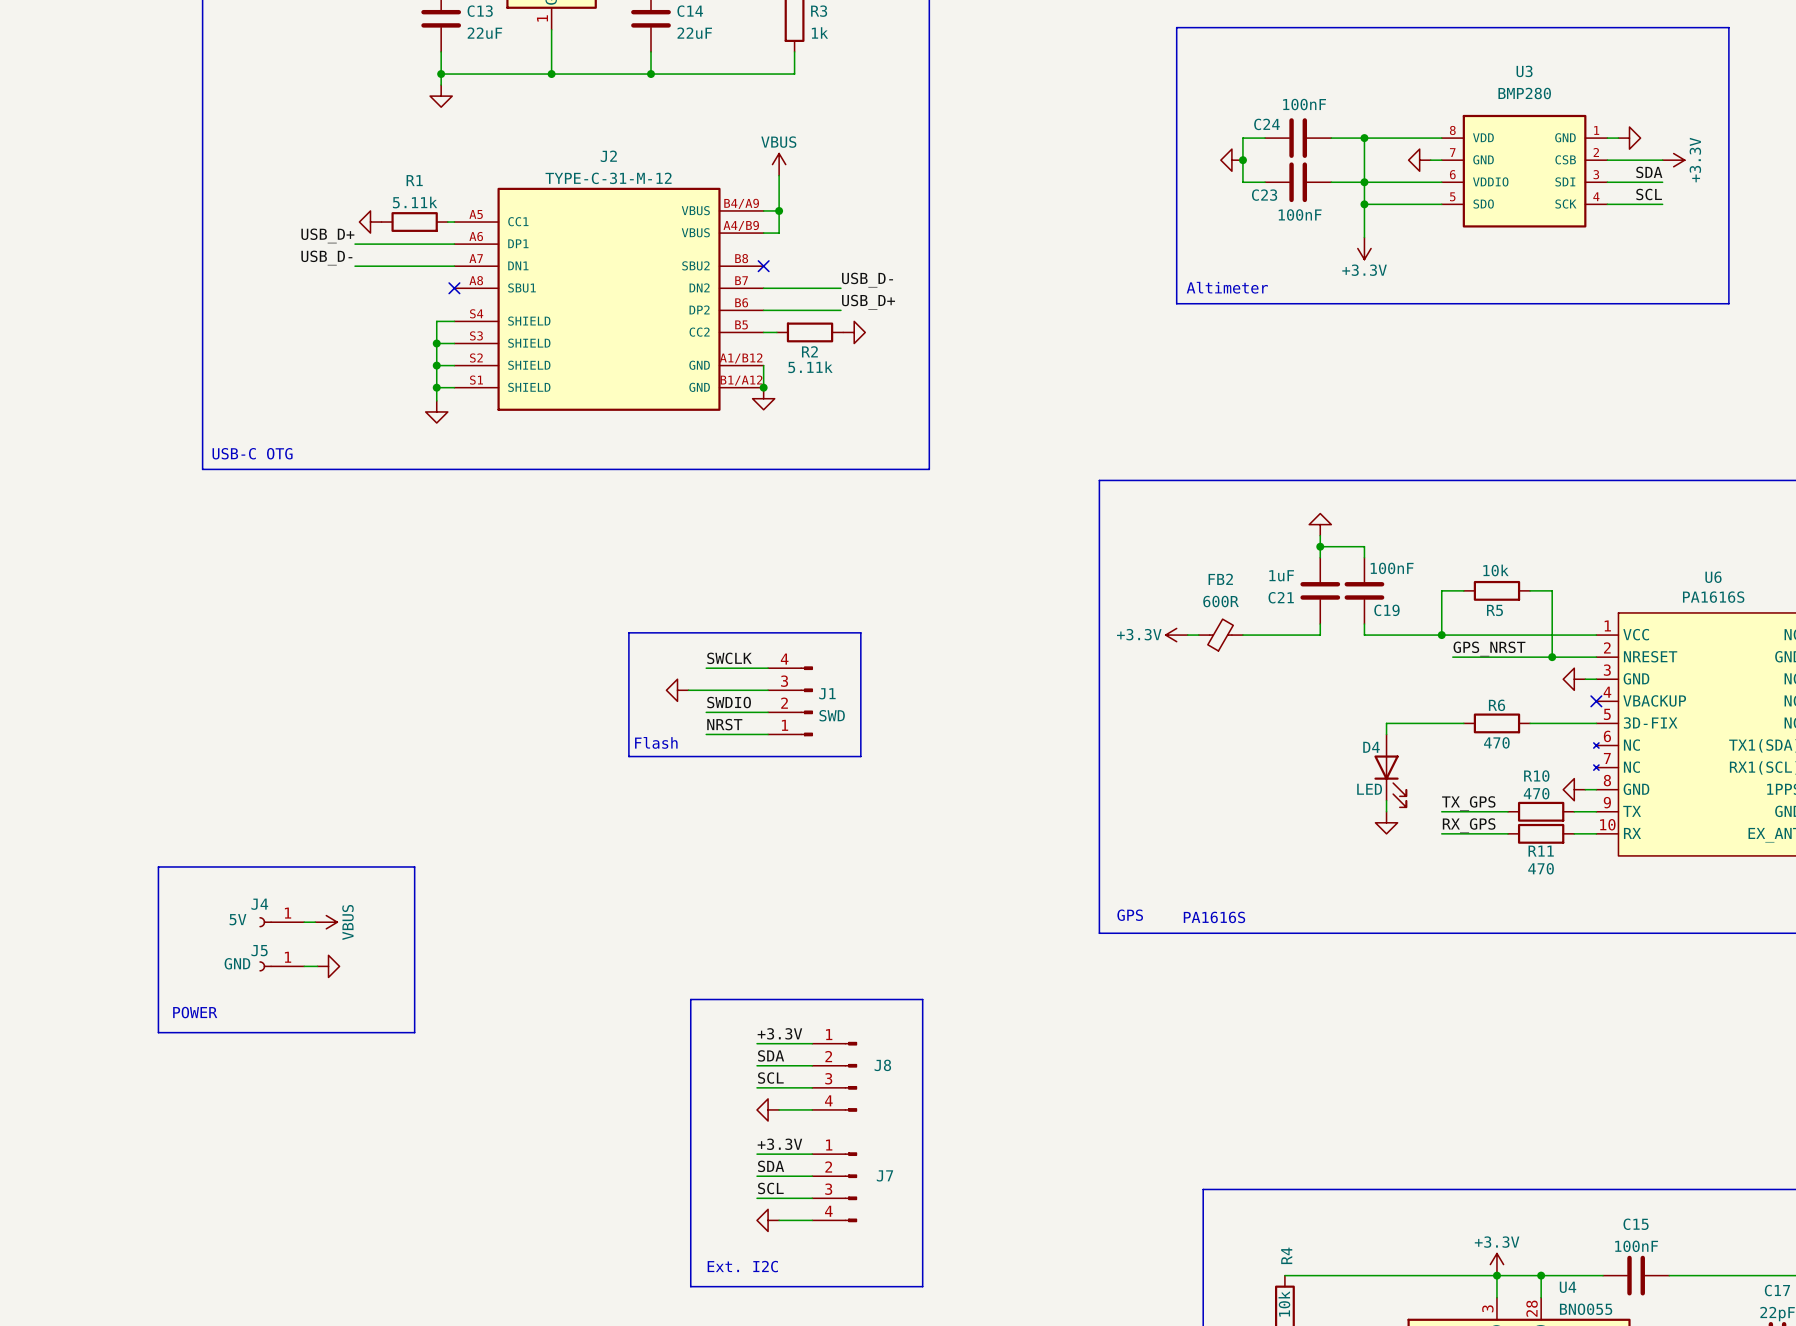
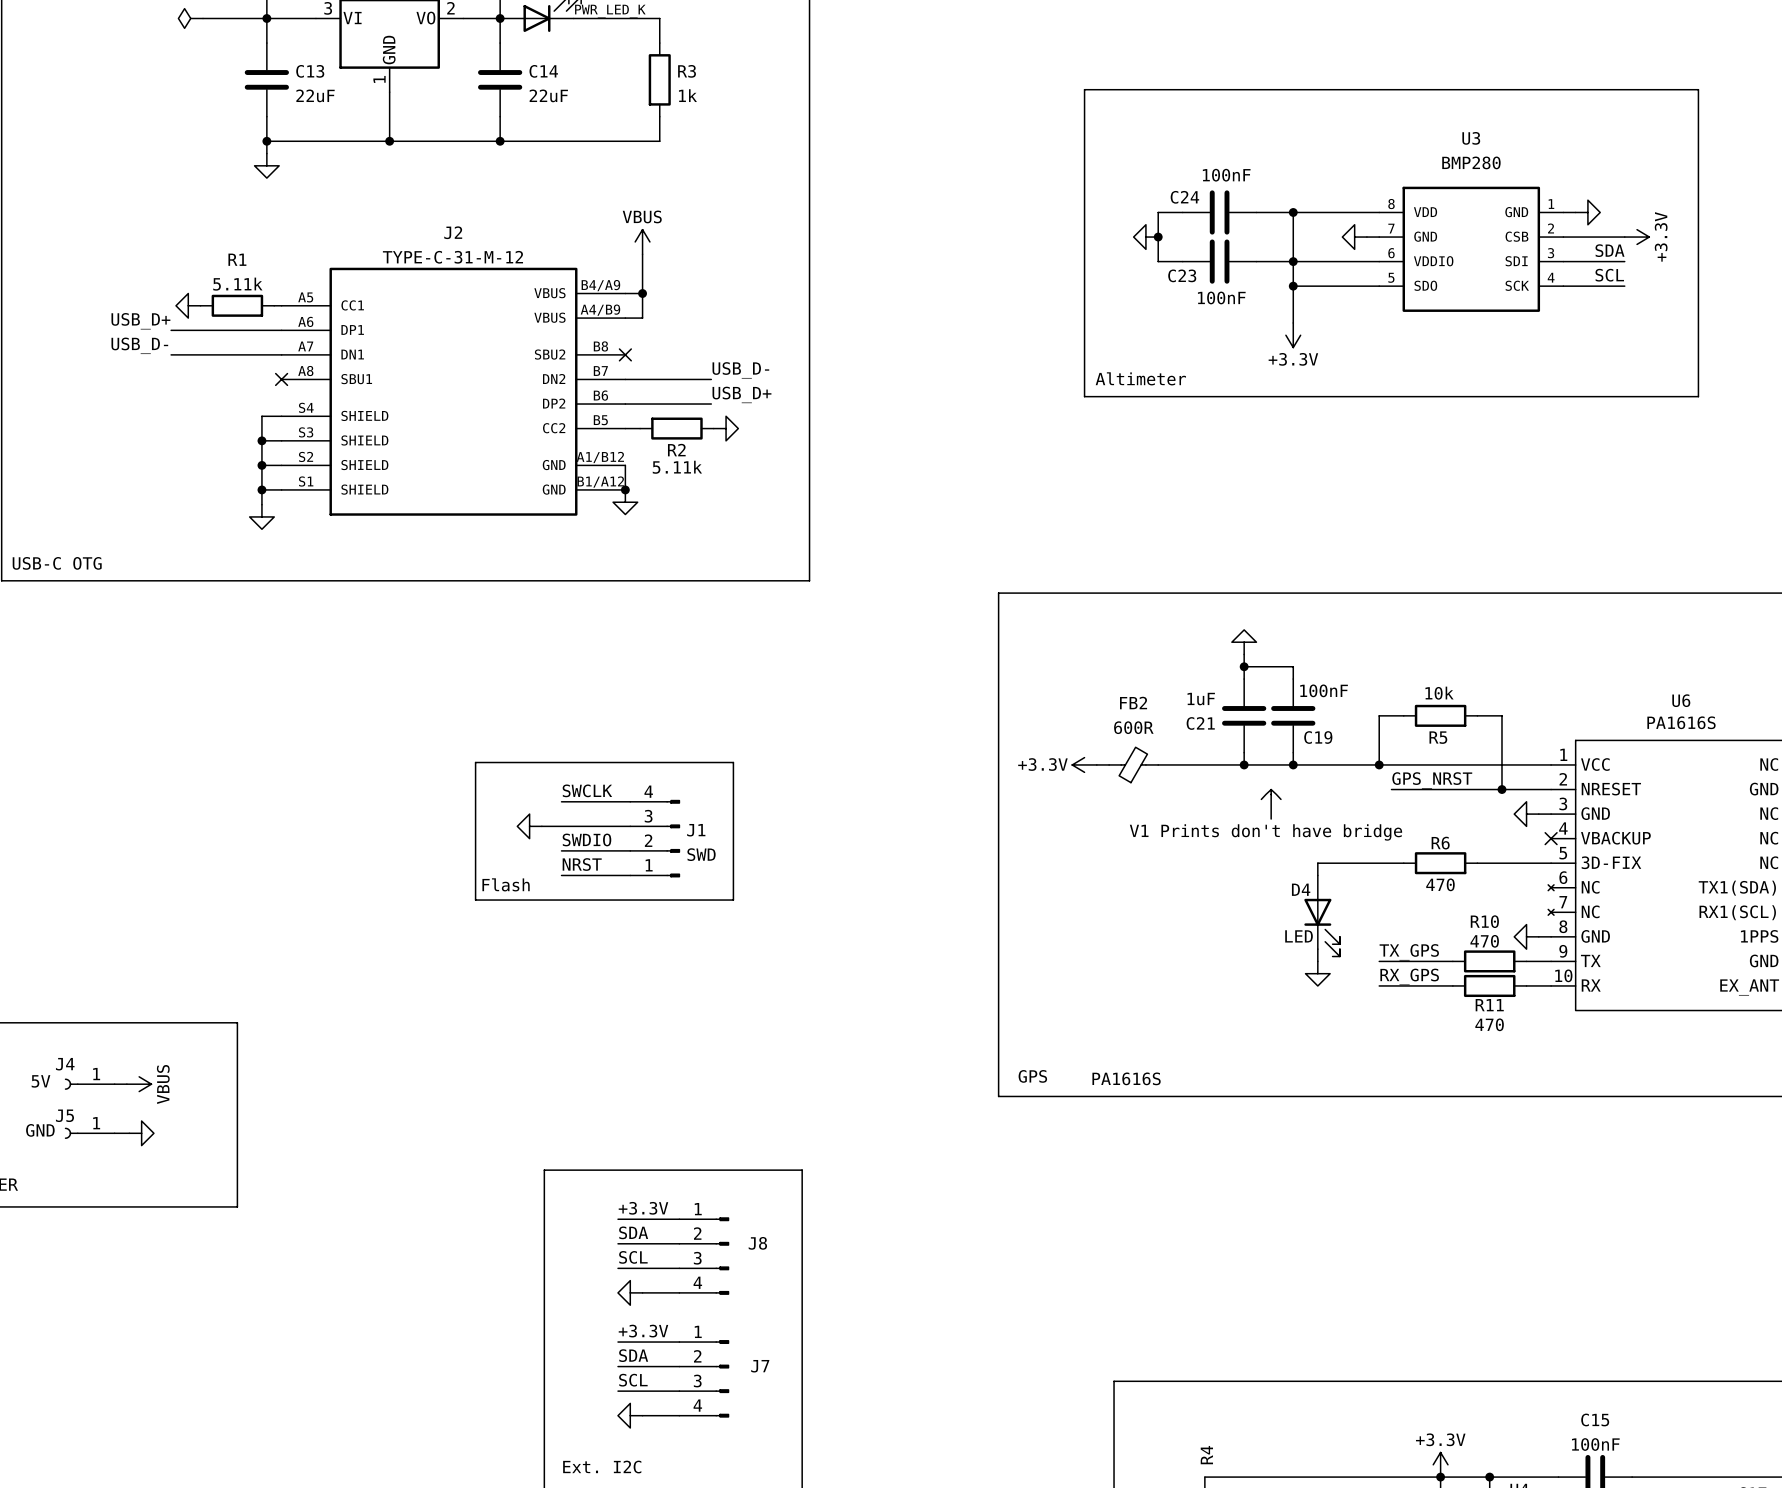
wire: none -> (1244, 764) (1293, 764)
junction: none -> (1244, 764)
junction: none -> (1293, 764)
line: none -> (1271, 789) (1261, 799)
line: none -> (1280, 799) (1271, 789) (1271, 819)
text: none -> V1 Prints don't have bridge (1265, 832)

